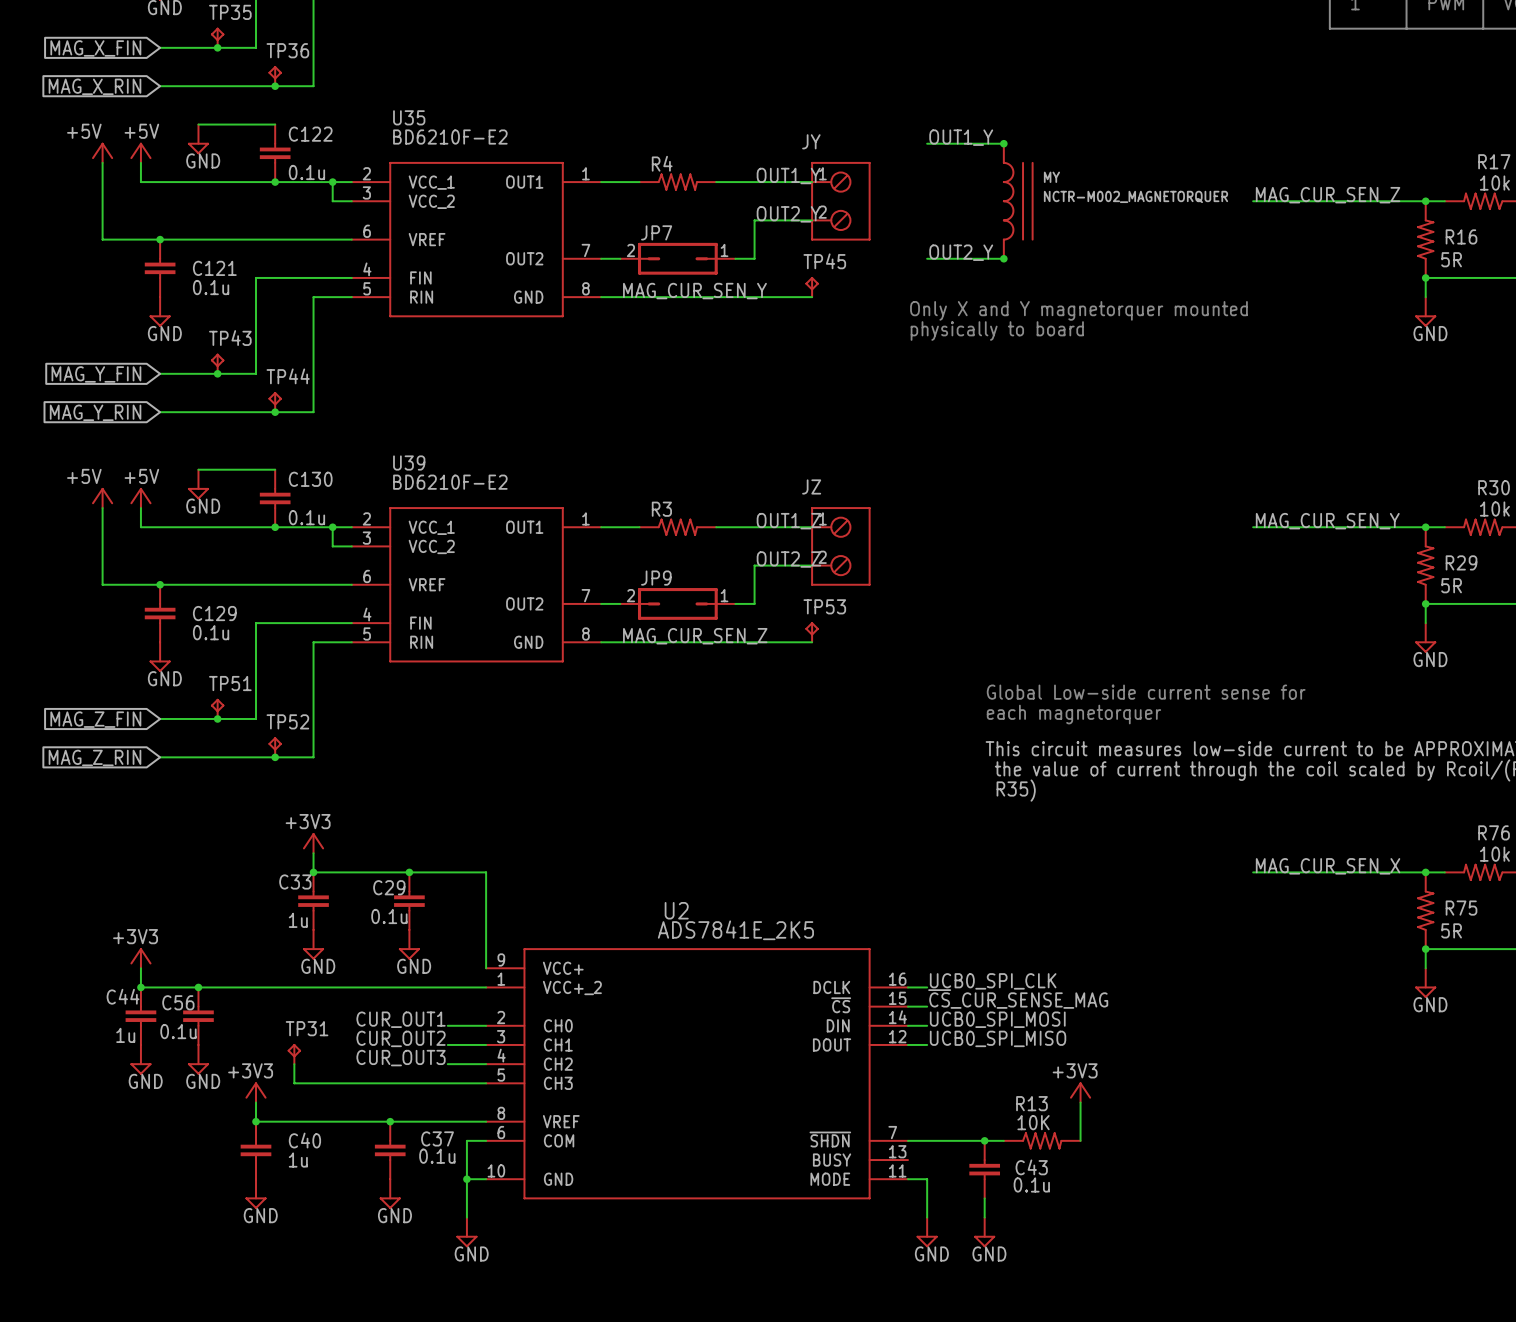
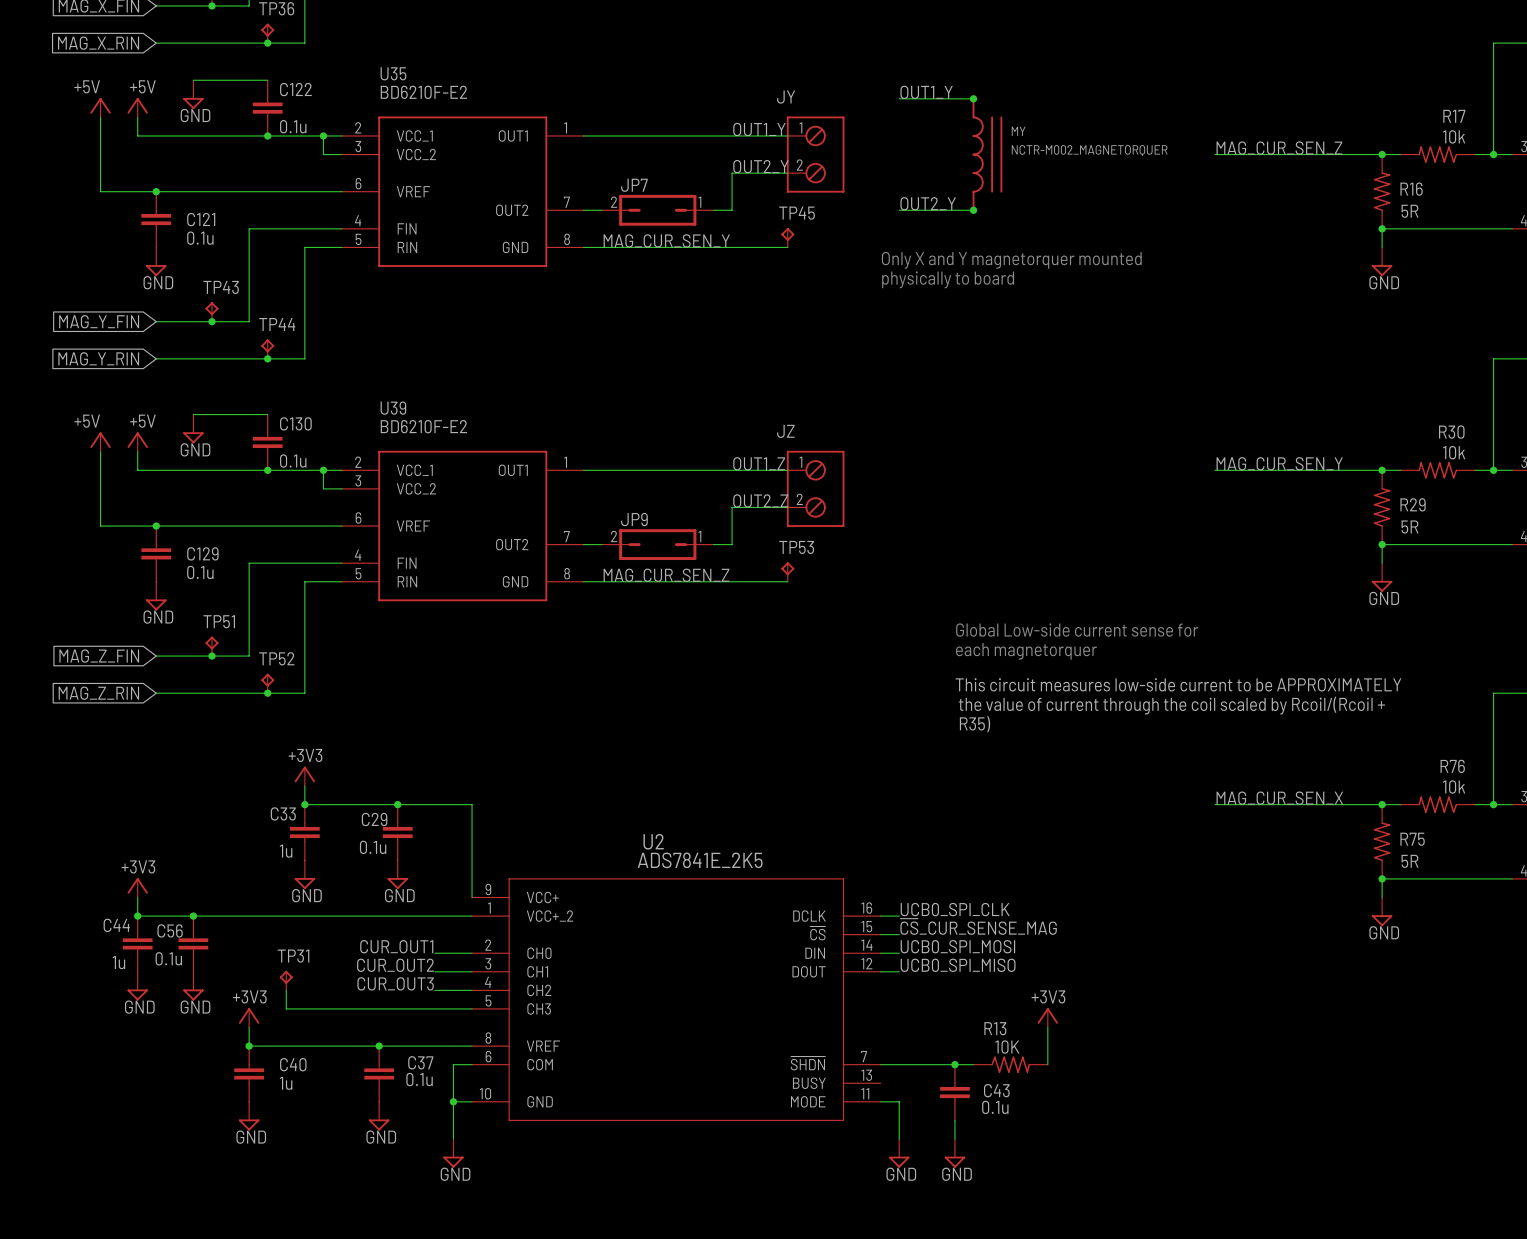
R4: (677, 182) -> none
R3: (677, 527) -> none

